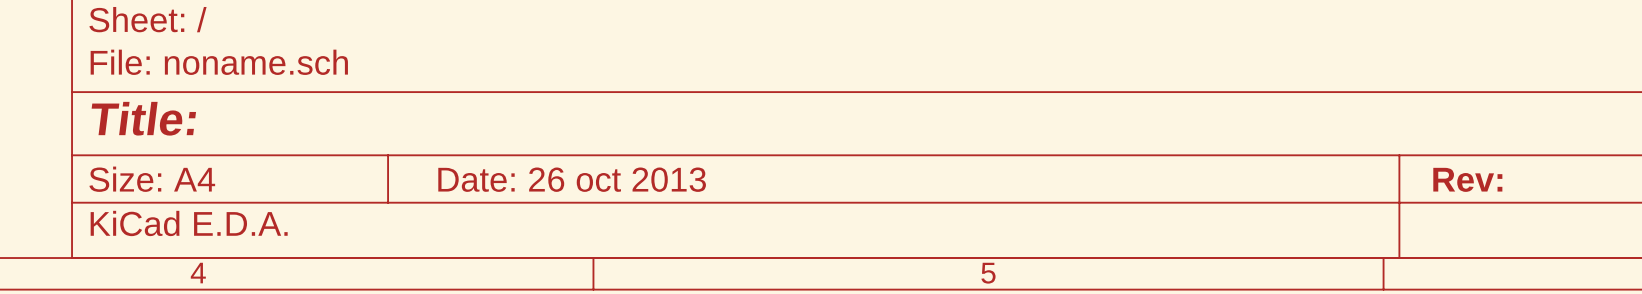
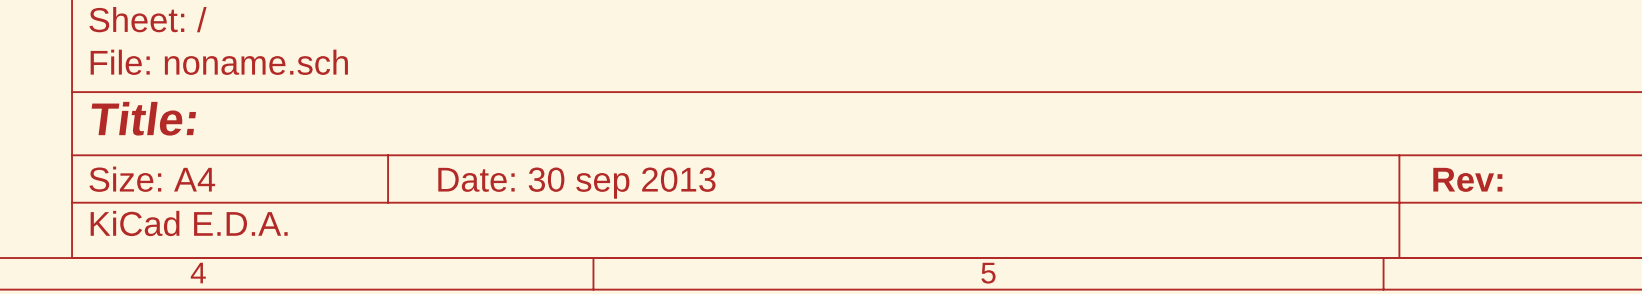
title block: Date: 26 oct 2013 (572, 179) -> Date: 30 sep 2013 (576, 183)

